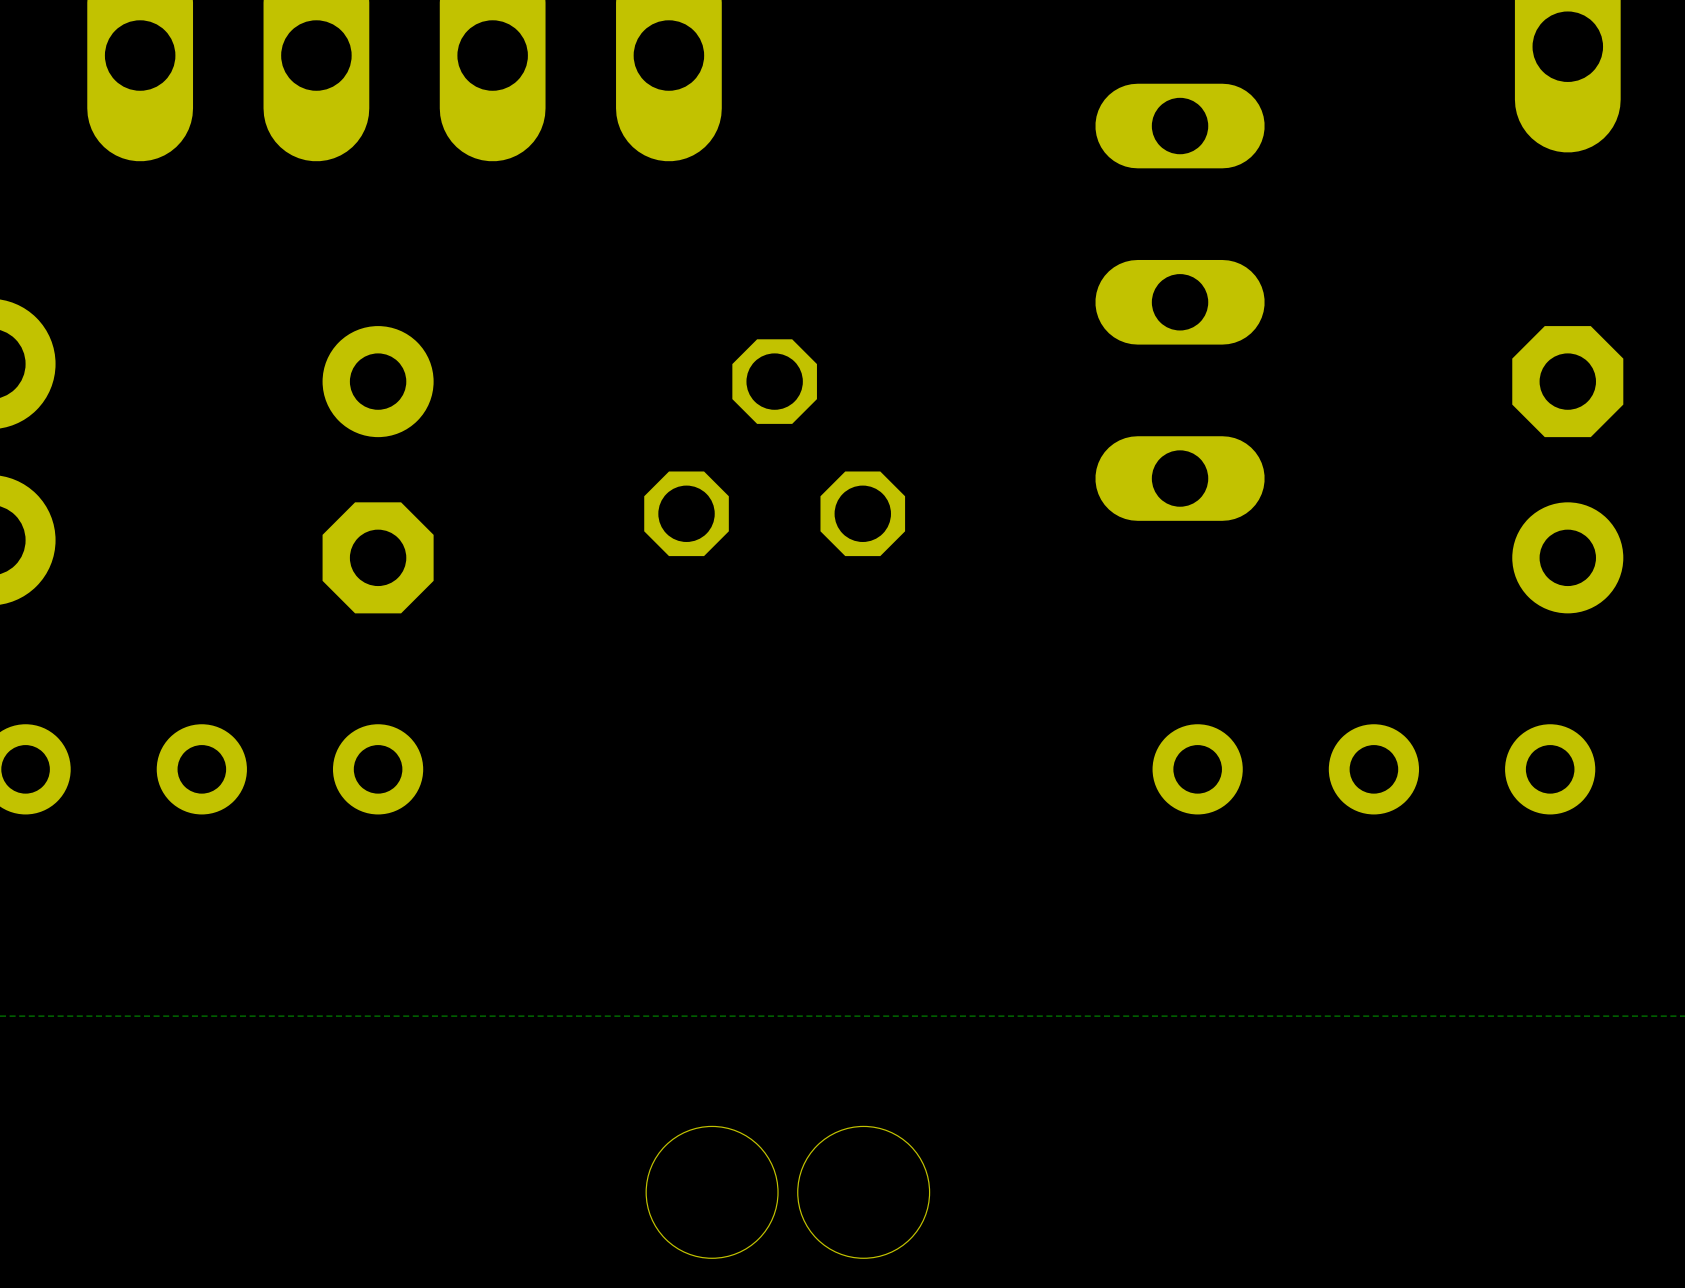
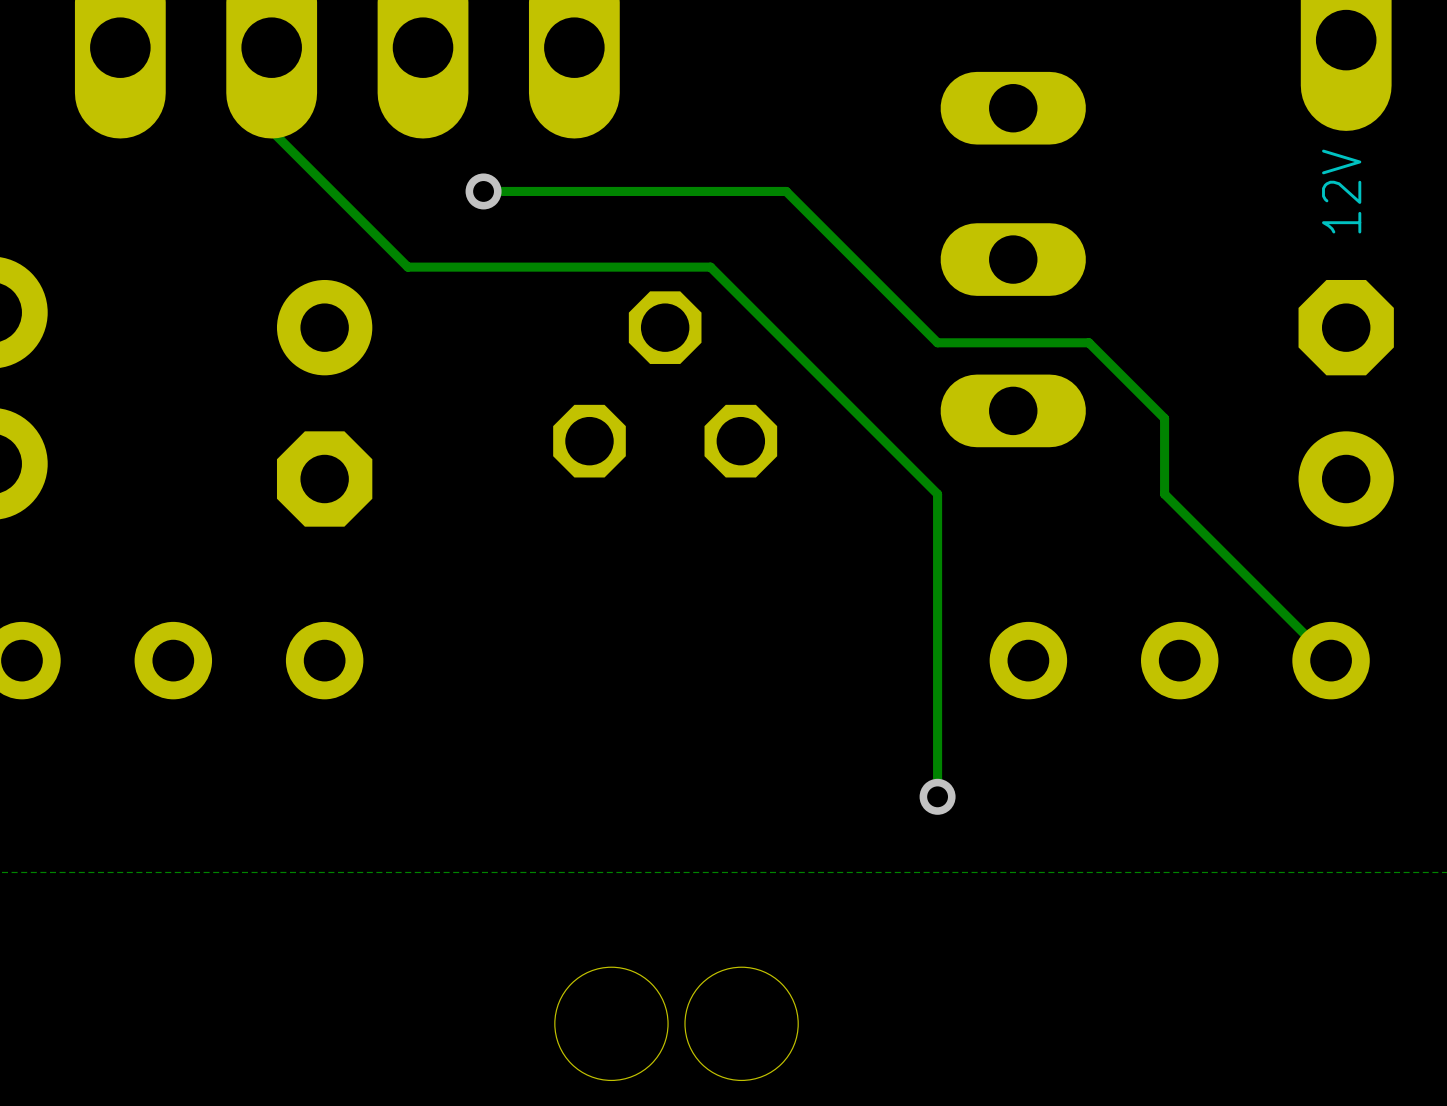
track: none -> (271, 47) (271, 130) (407, 267) (710, 267) (937, 494) (937, 796)
text: none -> 12V (1341, 191)
track: none -> (483, 191) (786, 191) (937, 342) (1088, 342) (1164, 418) (1164, 494) (1331, 660)
via: none -> (483, 191)
via: none -> (937, 796)

